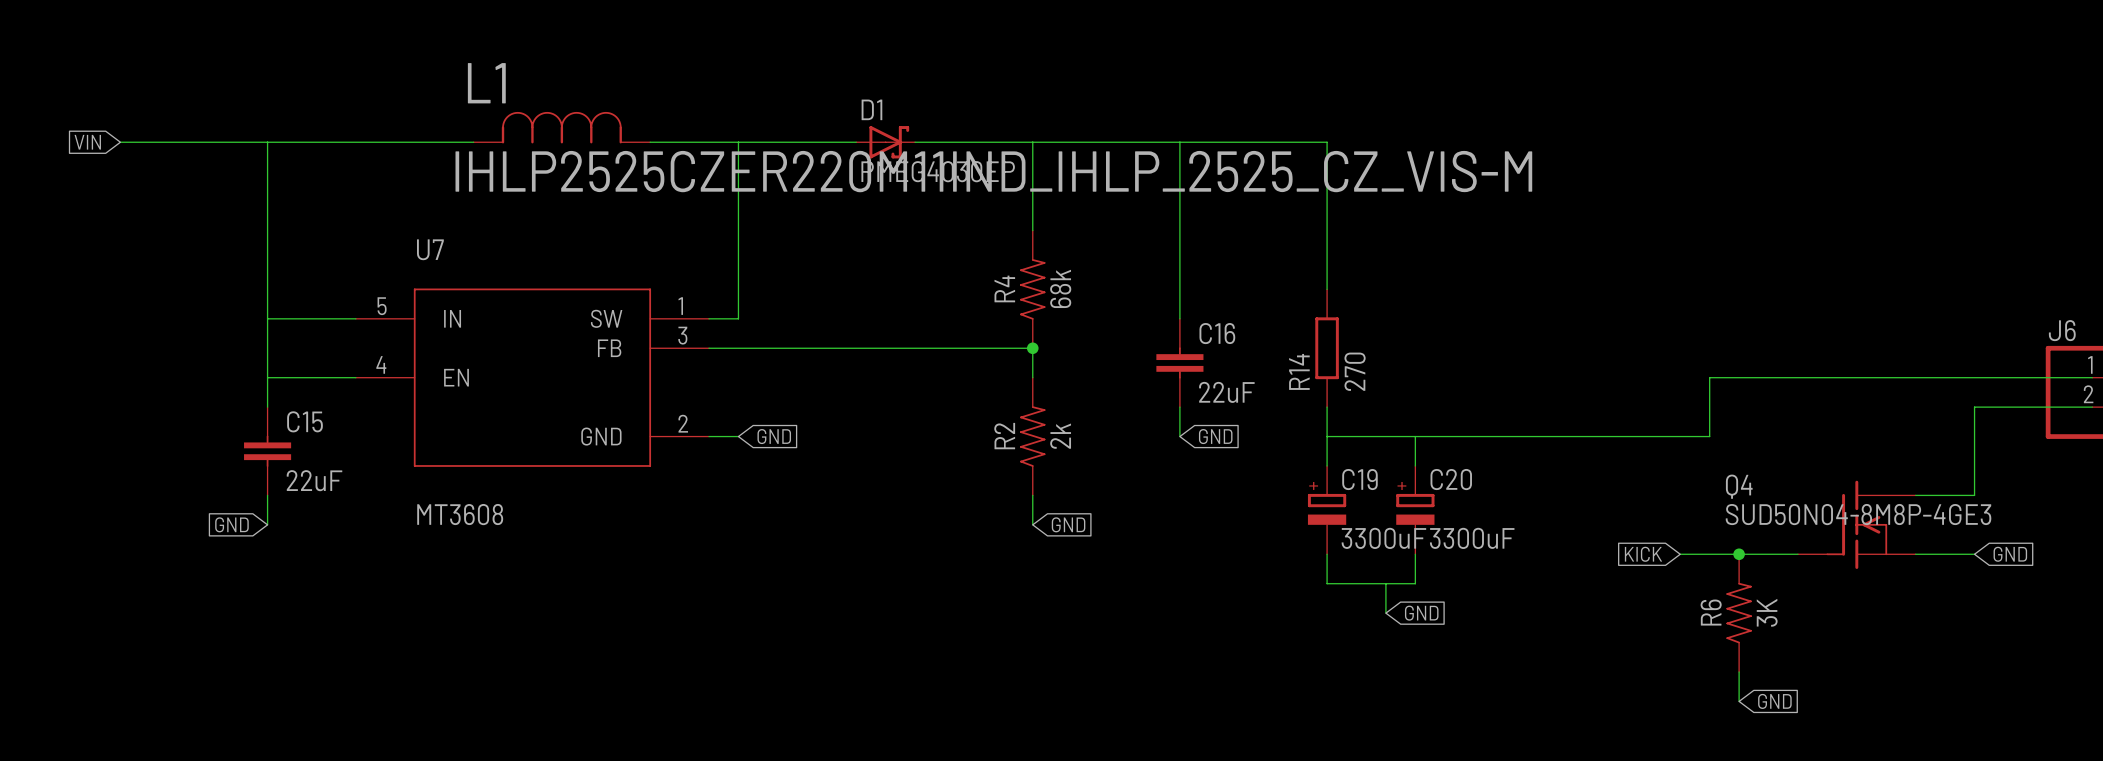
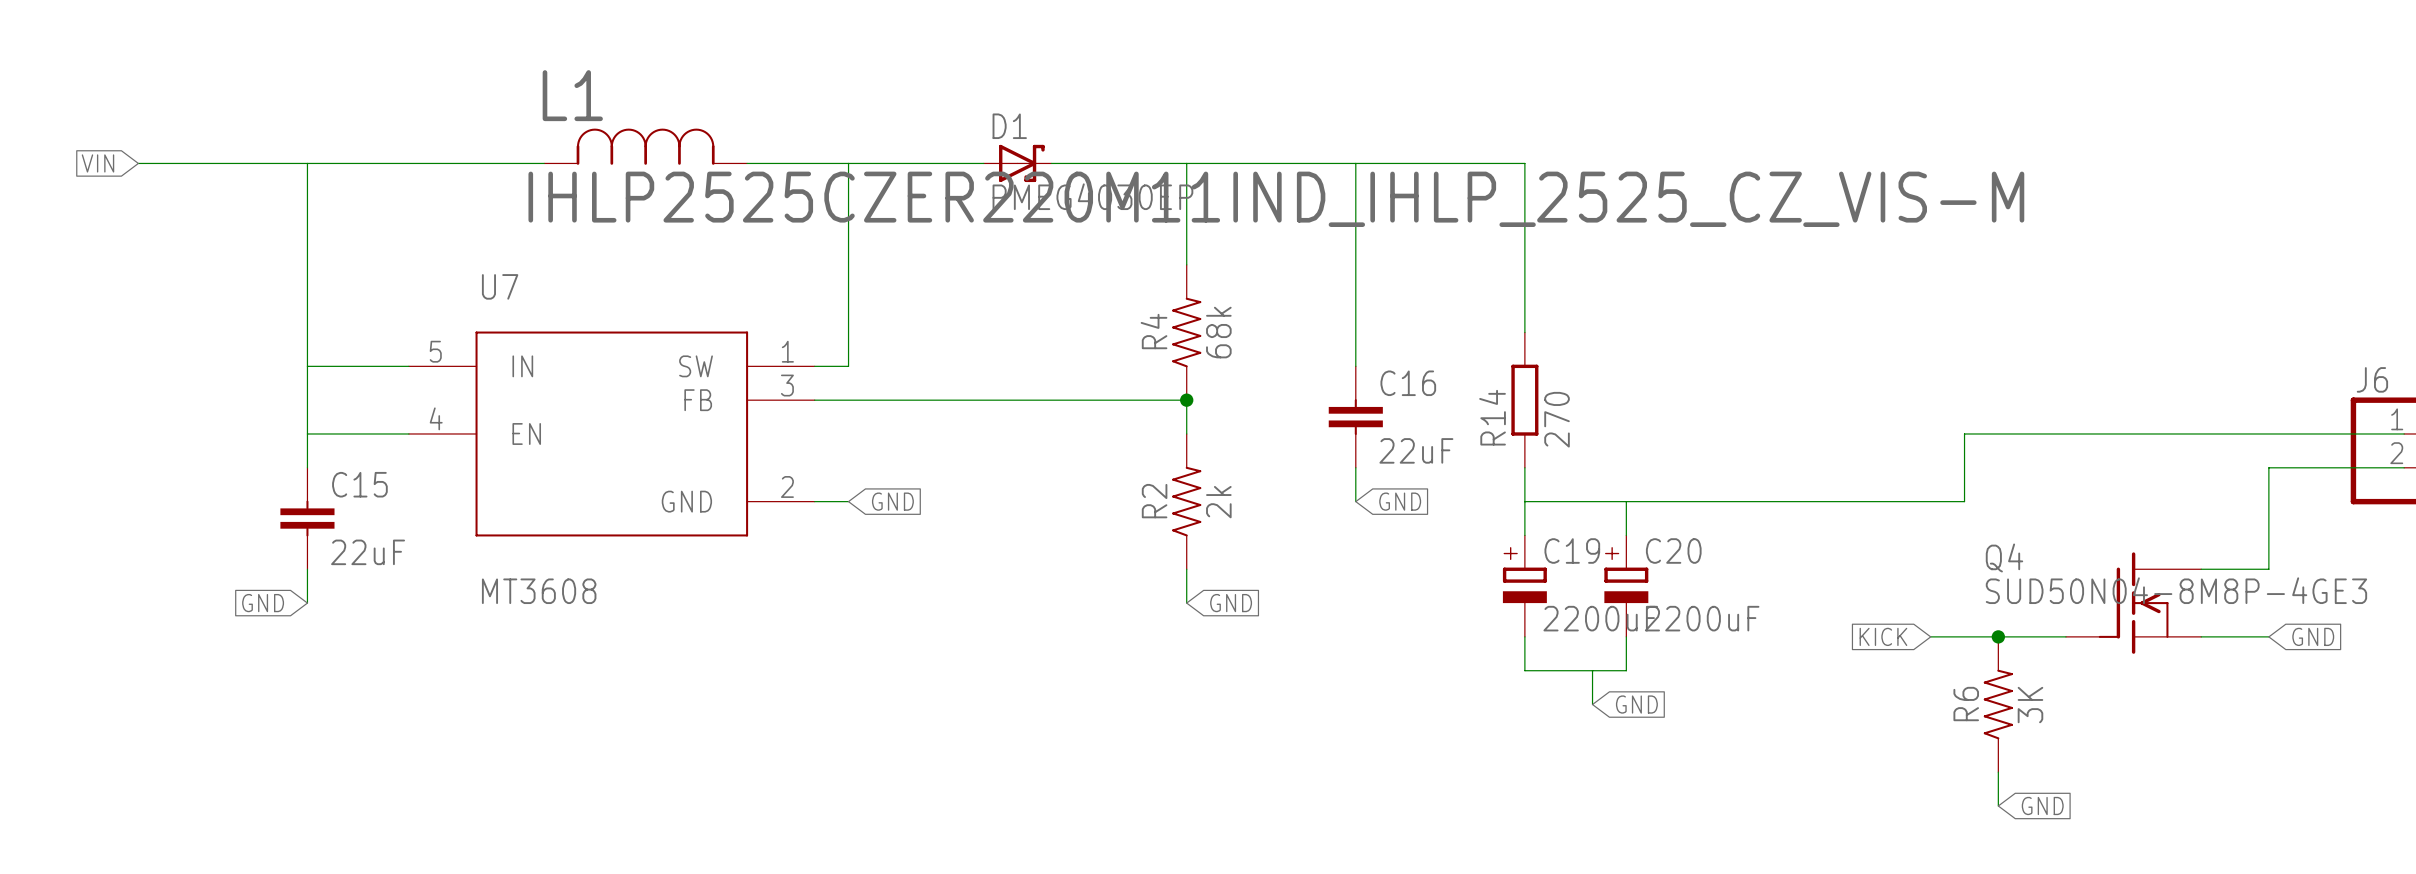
C19 value: 3300uF (1383, 538) -> 2200uF (1600, 618)
C20 value: 3300uF (1472, 538) -> 2200uF (1702, 618)

